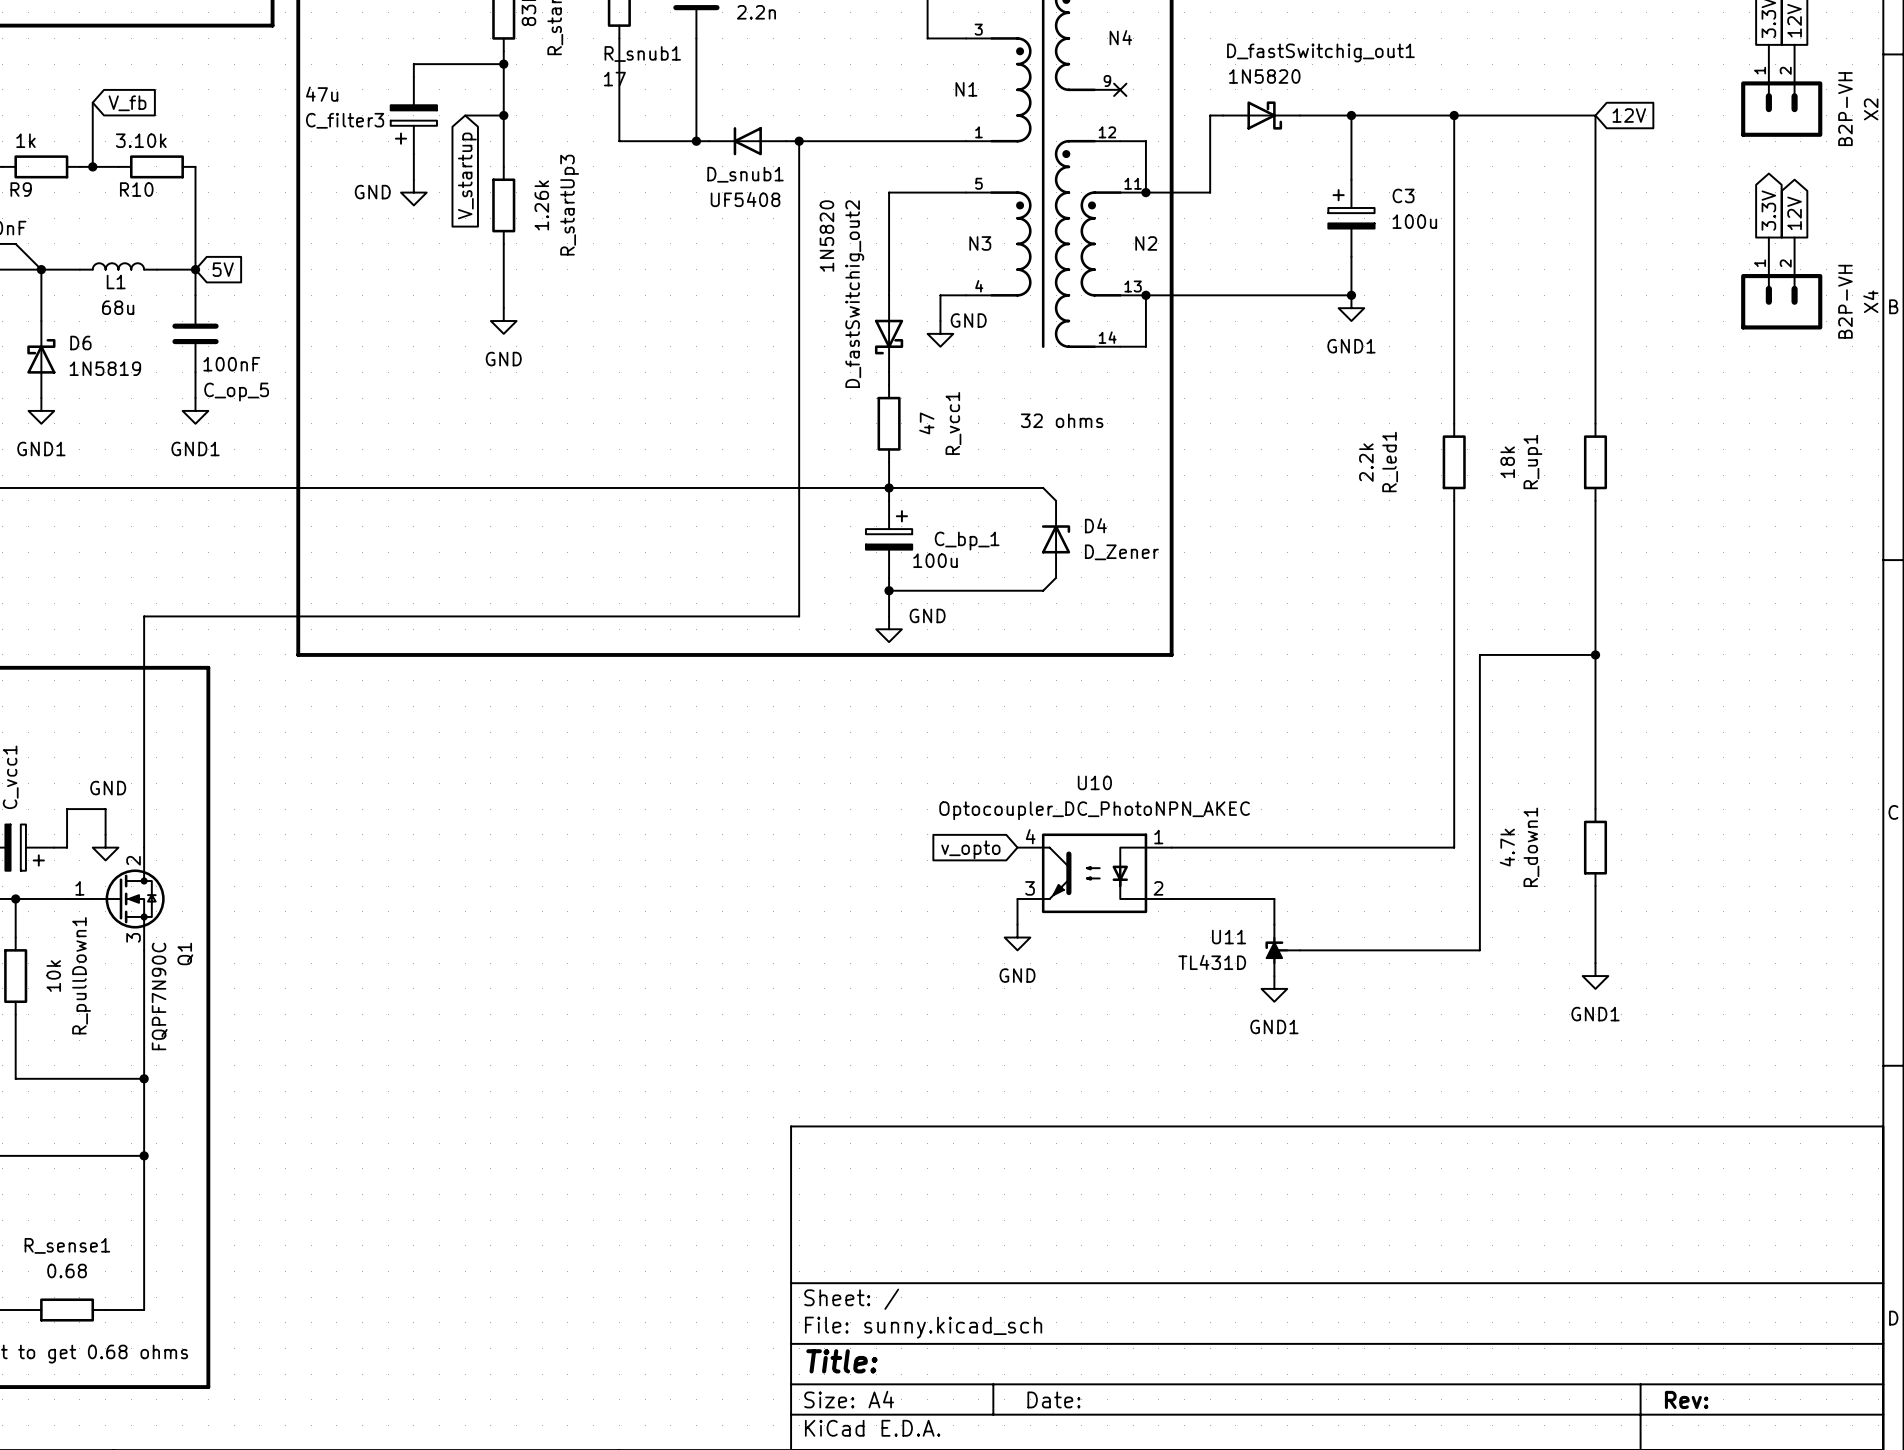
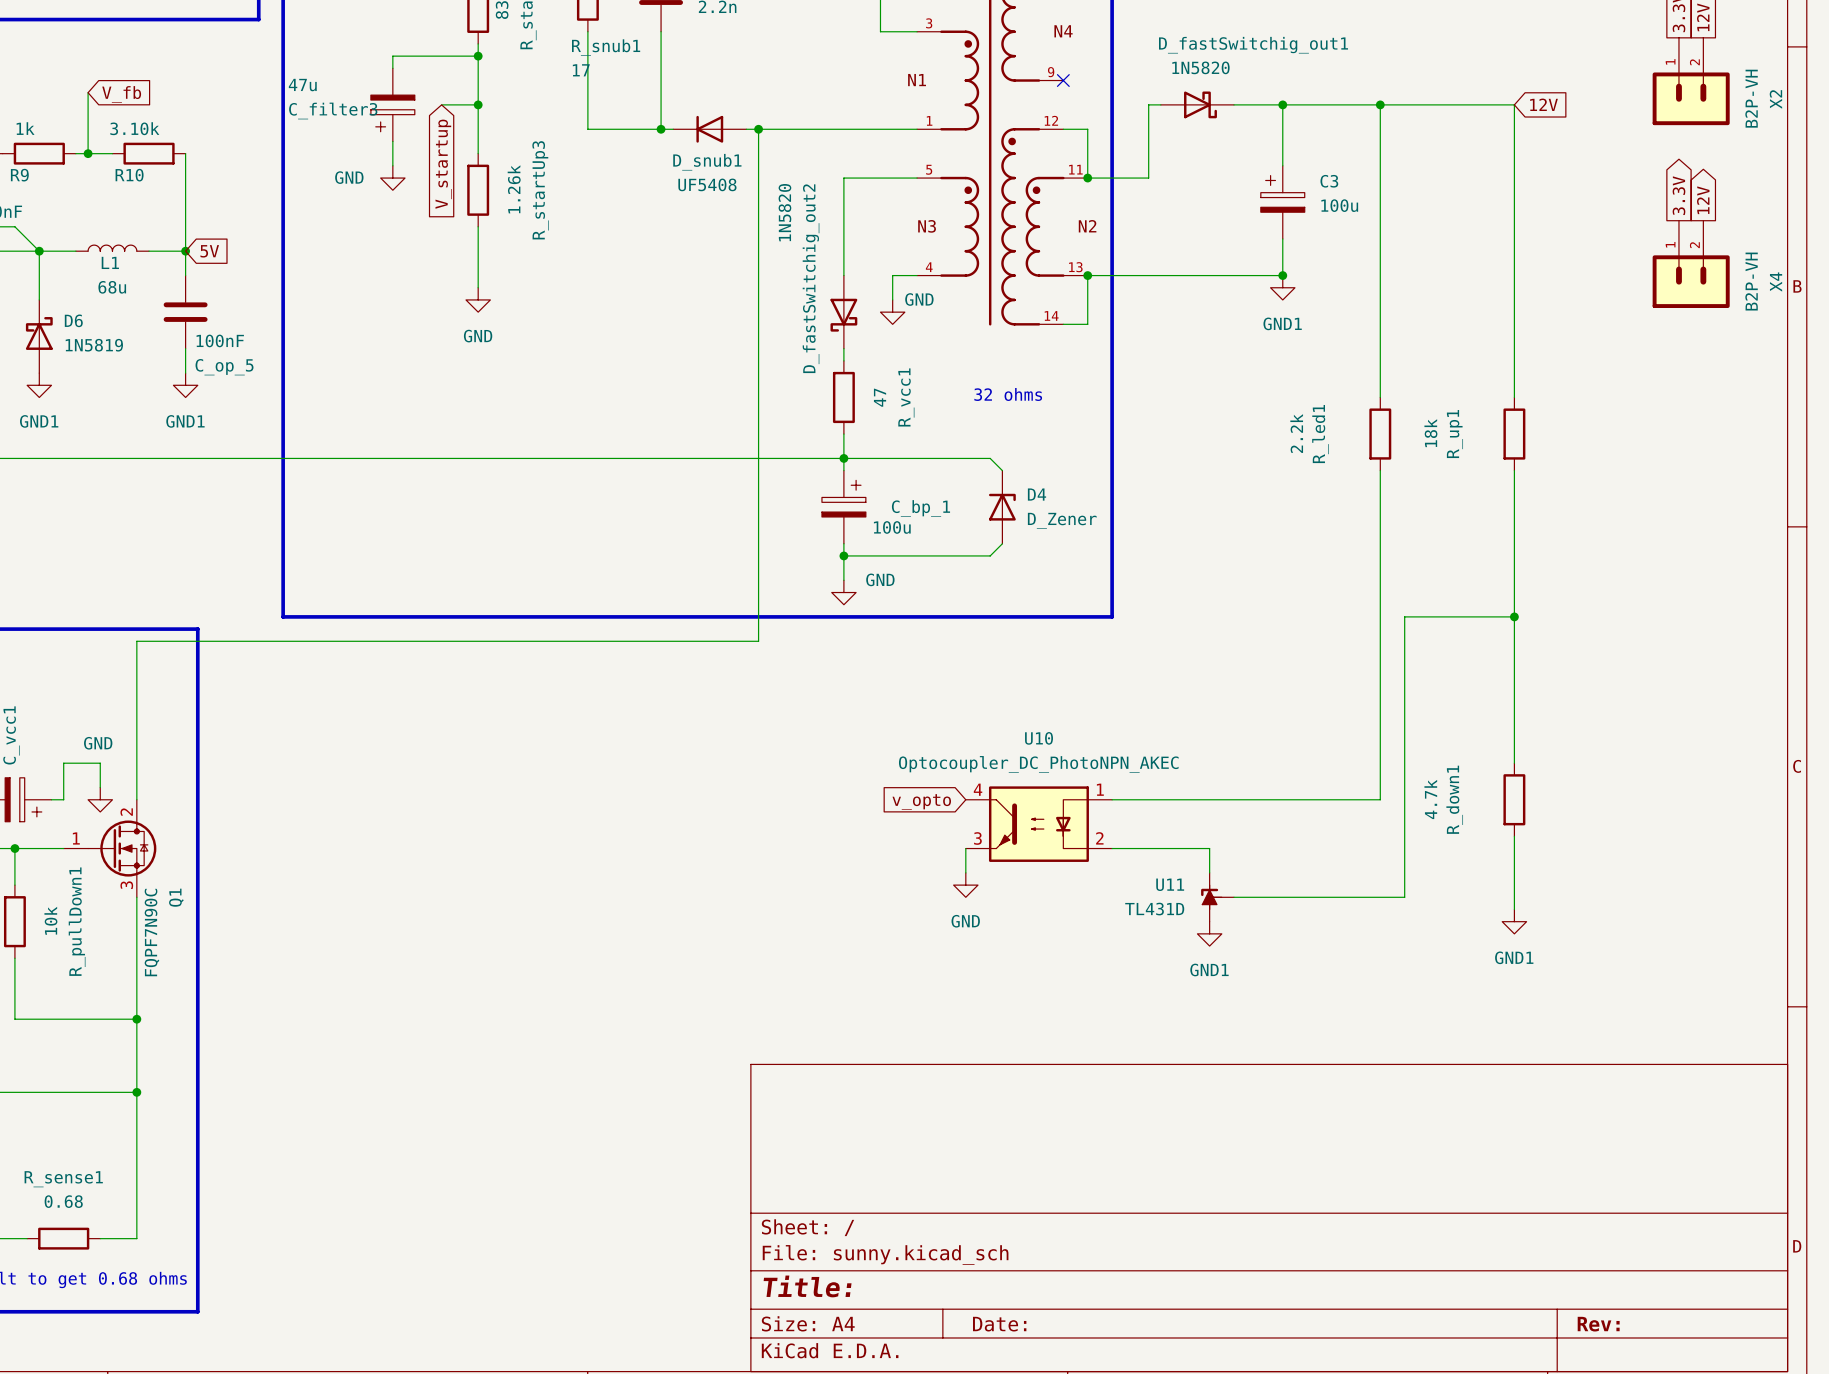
wire: (799, 616) (144, 616) (144, 680) -> (758, 580) (758, 641) (136, 641)

